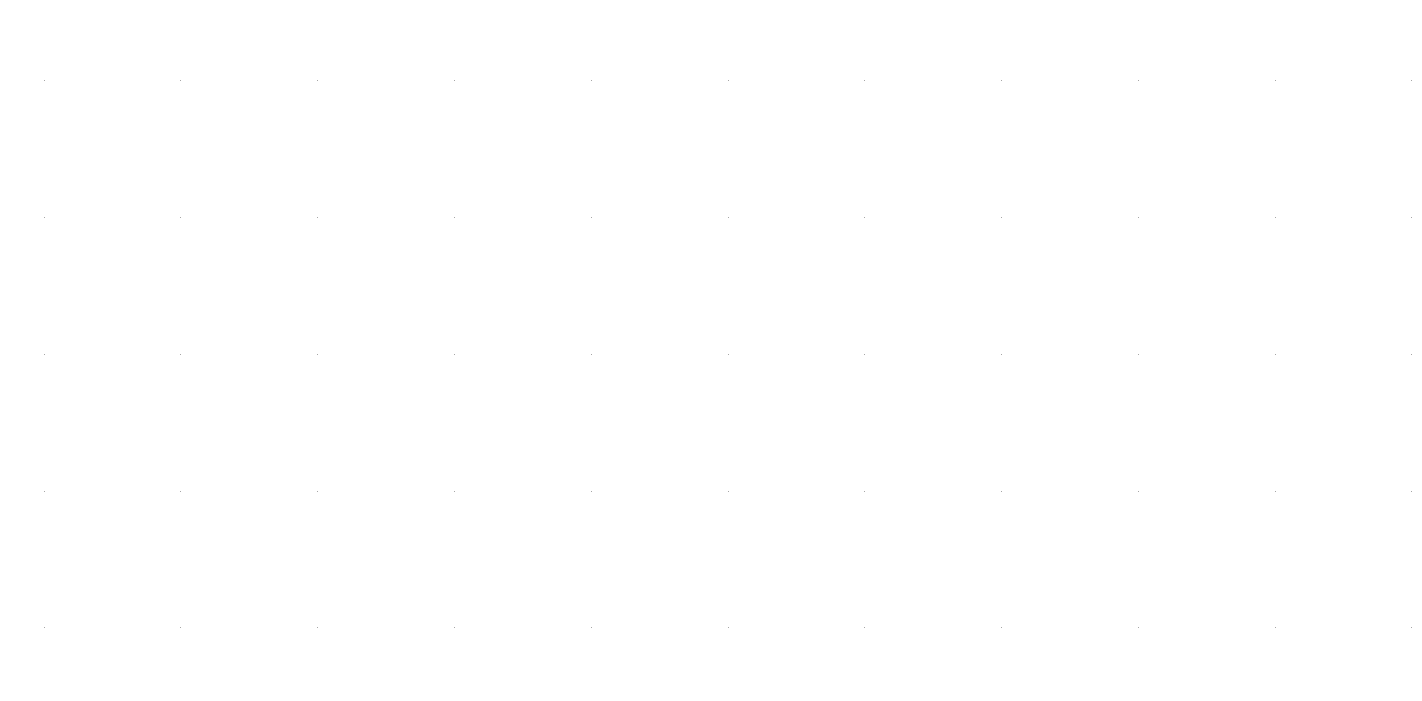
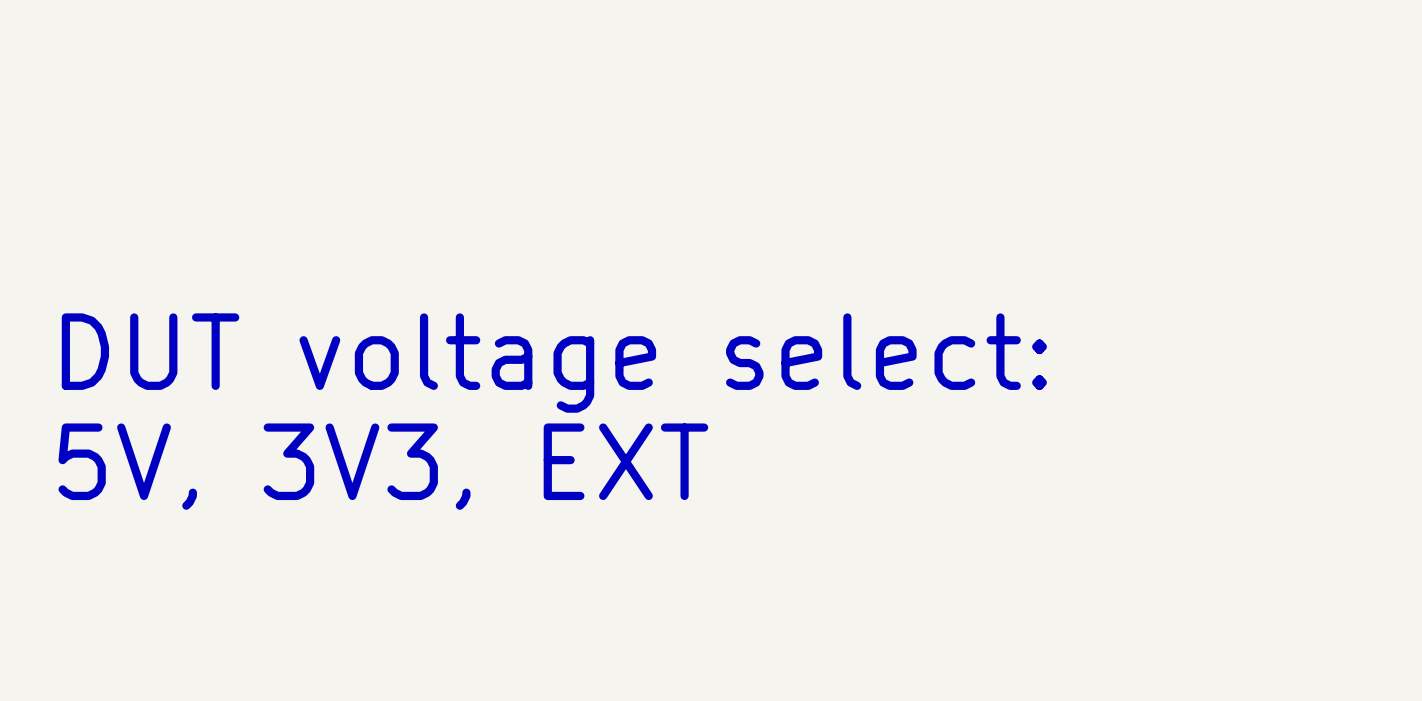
text: none -> DUT voltage select: (554, 363)
text: none -> 5V, 3V3, EXT (383, 466)

